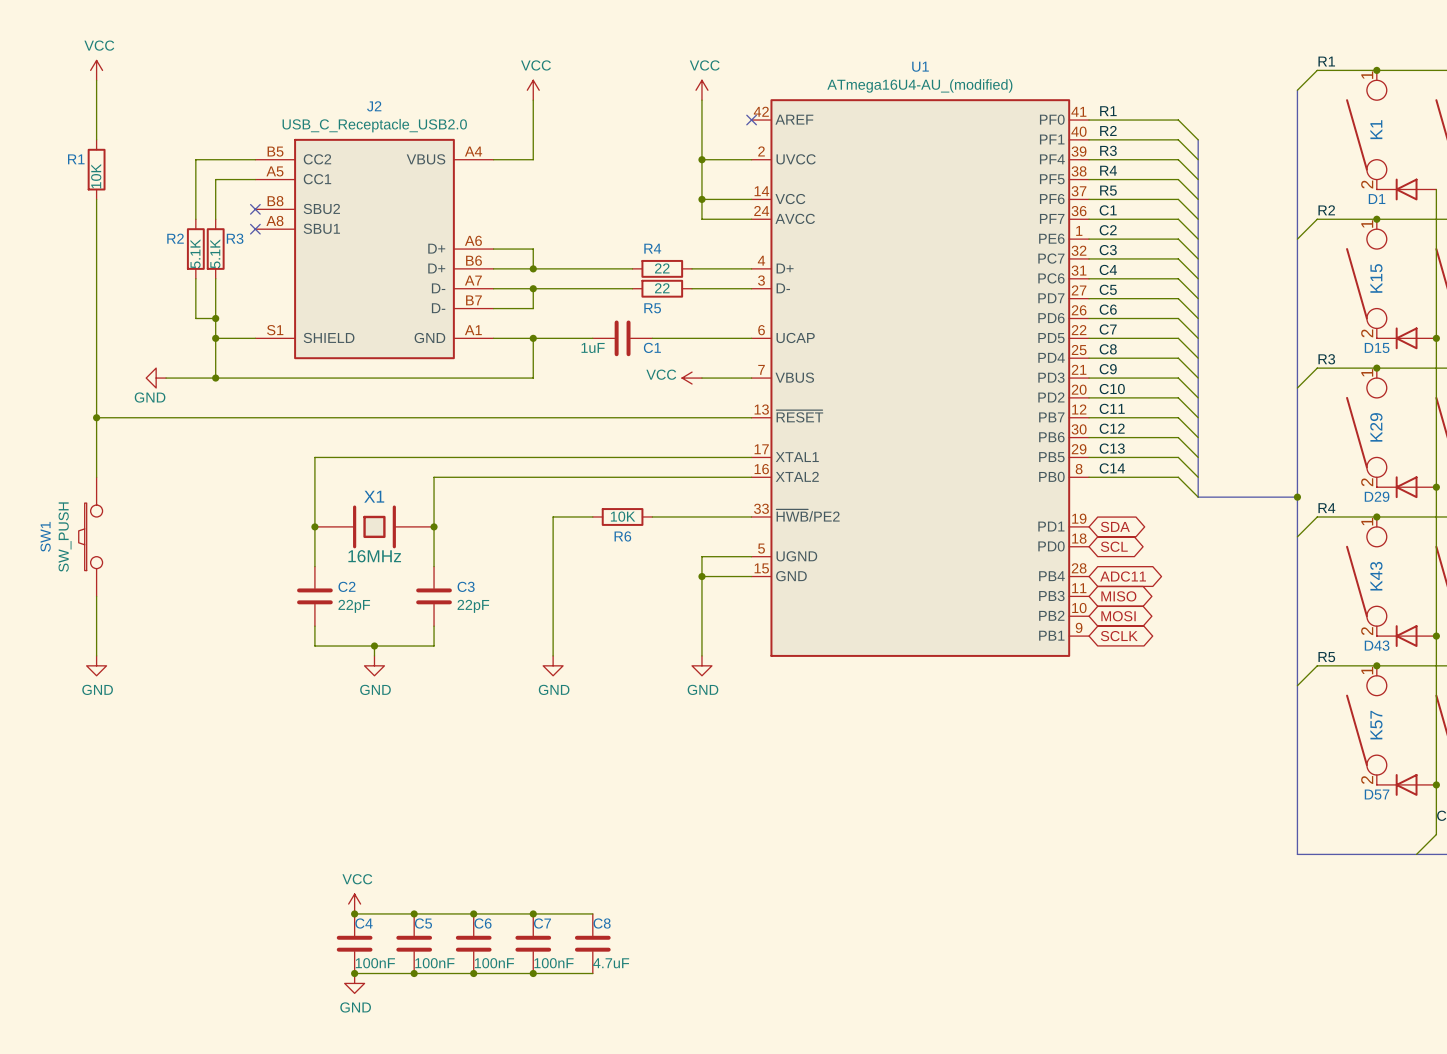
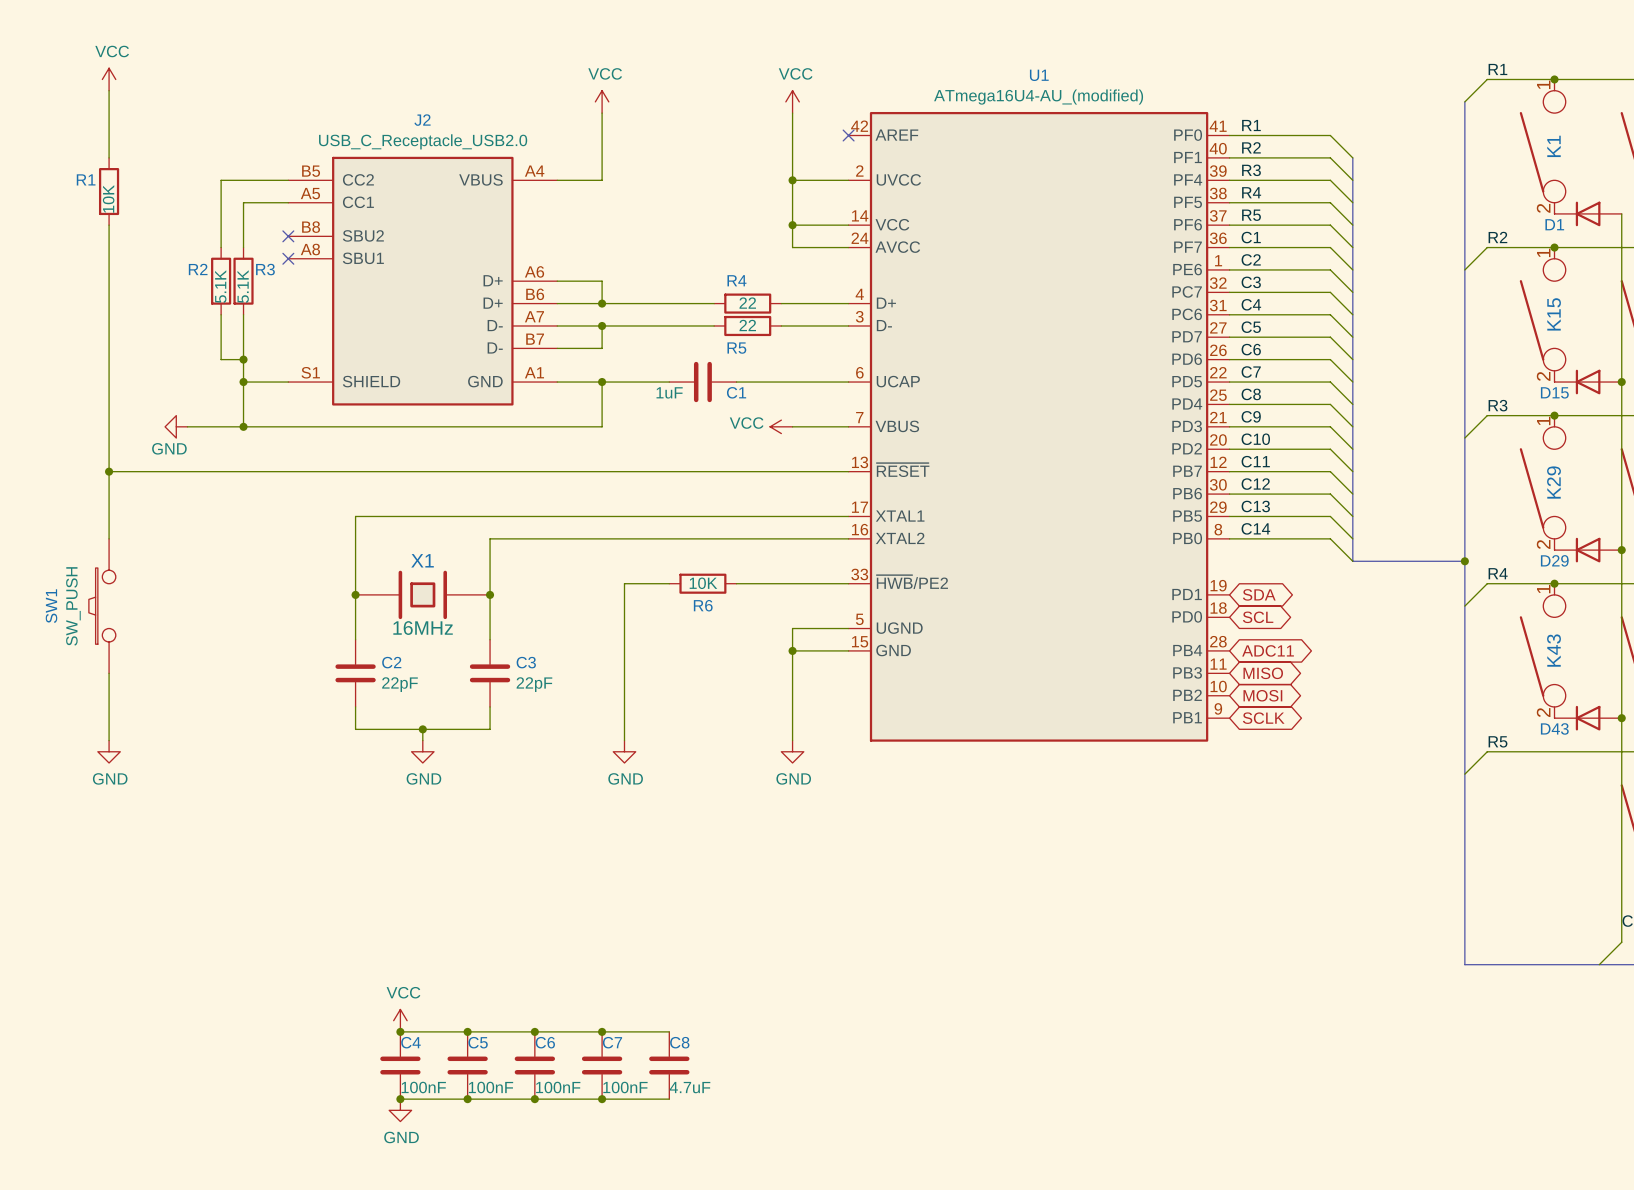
junction: (1376, 665) -> none
K57: (1366, 725) -> none
D57: (1406, 784) -> none
junction: (1436, 784) -> none

